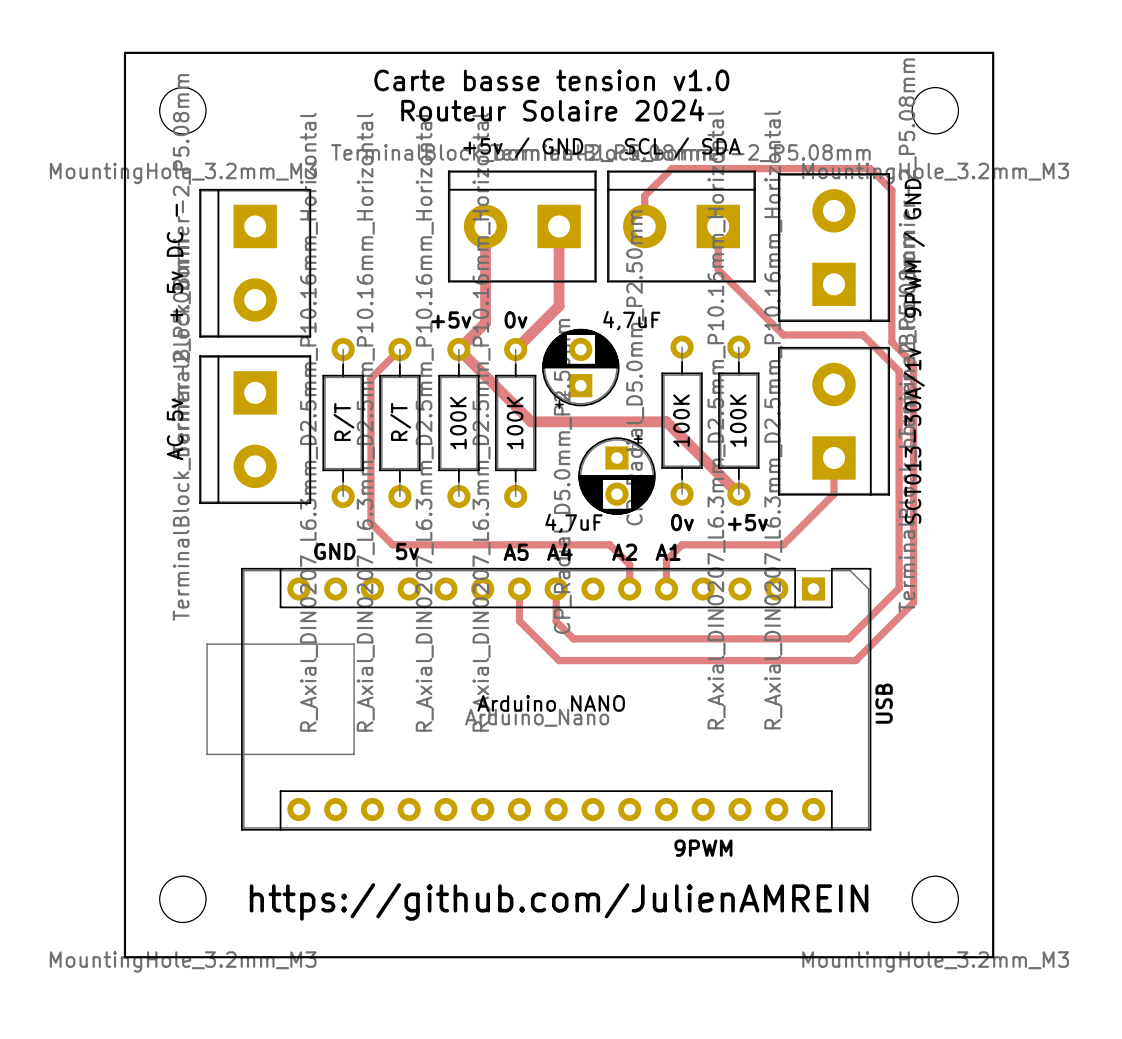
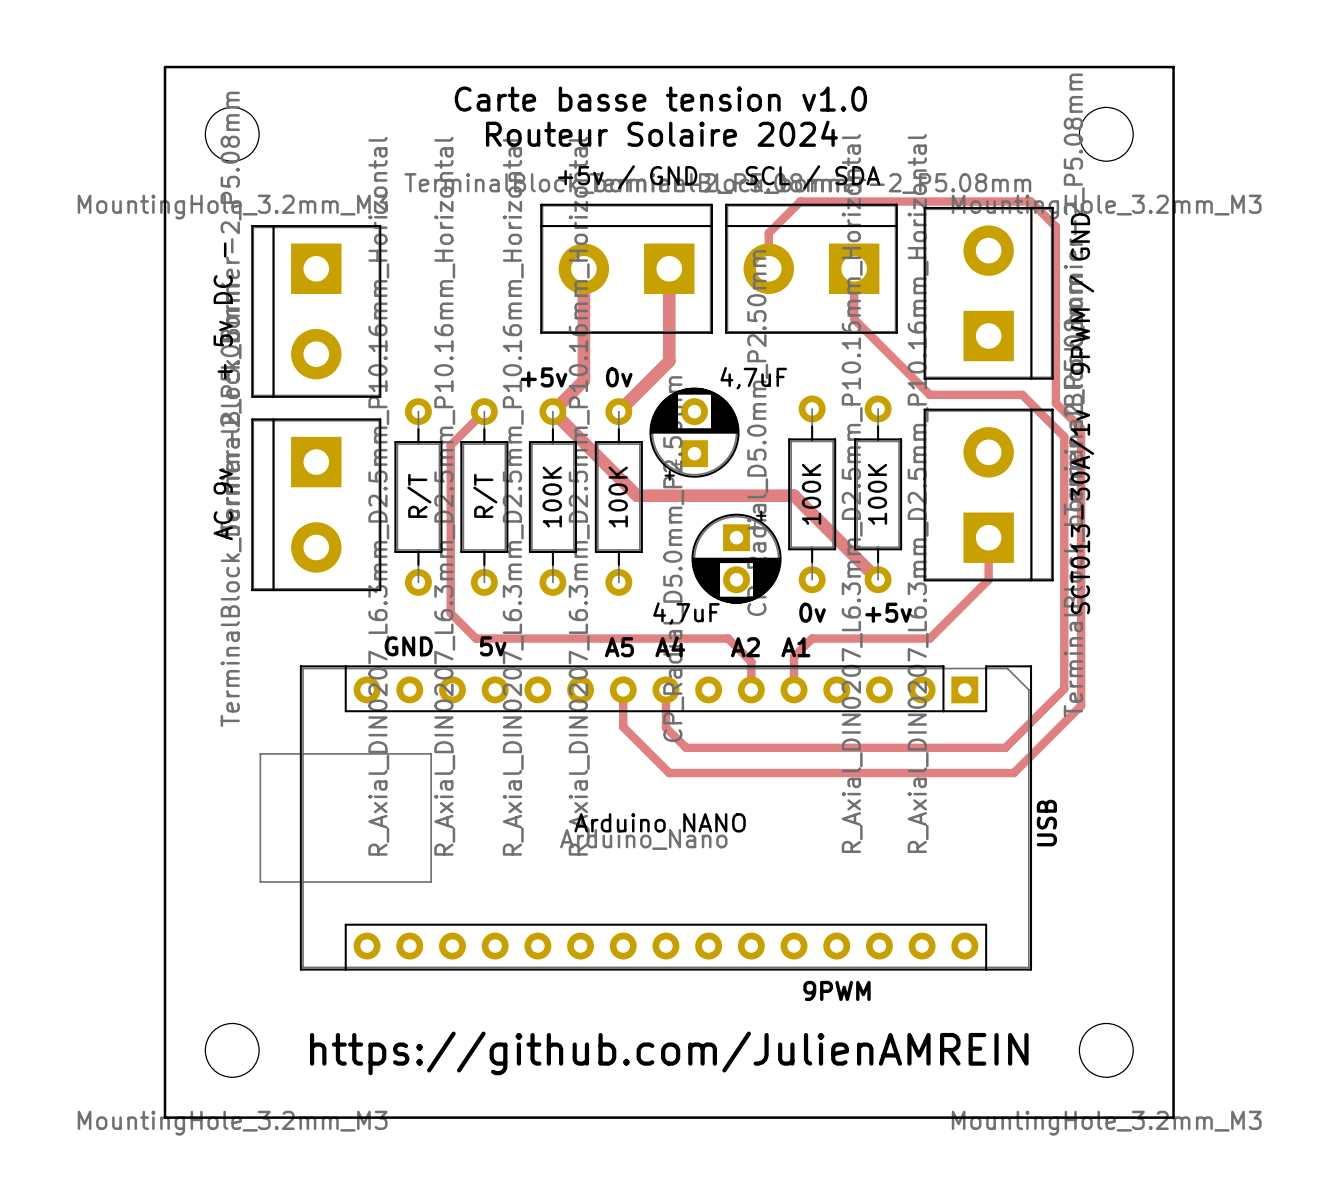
AC 5v name: AC 5v (175, 429) -> AC 9v (223, 504)

